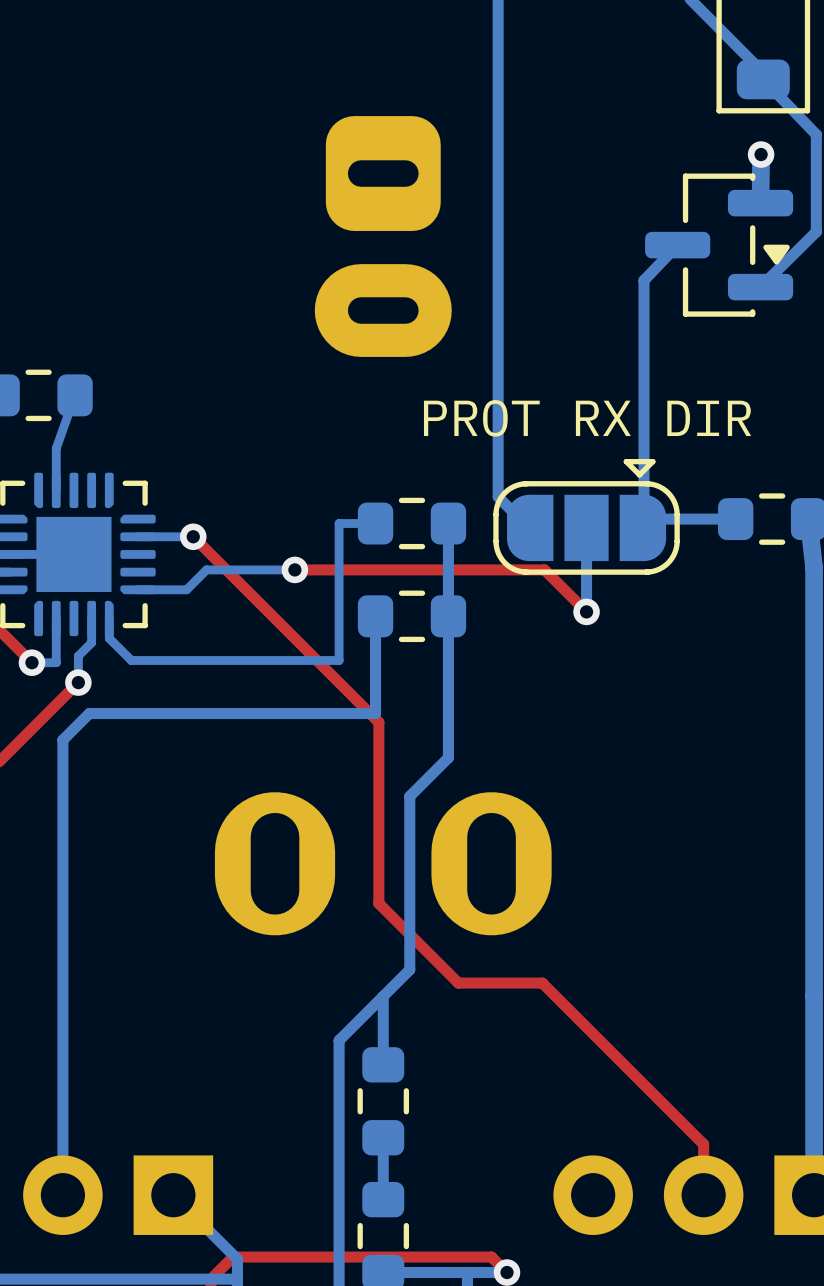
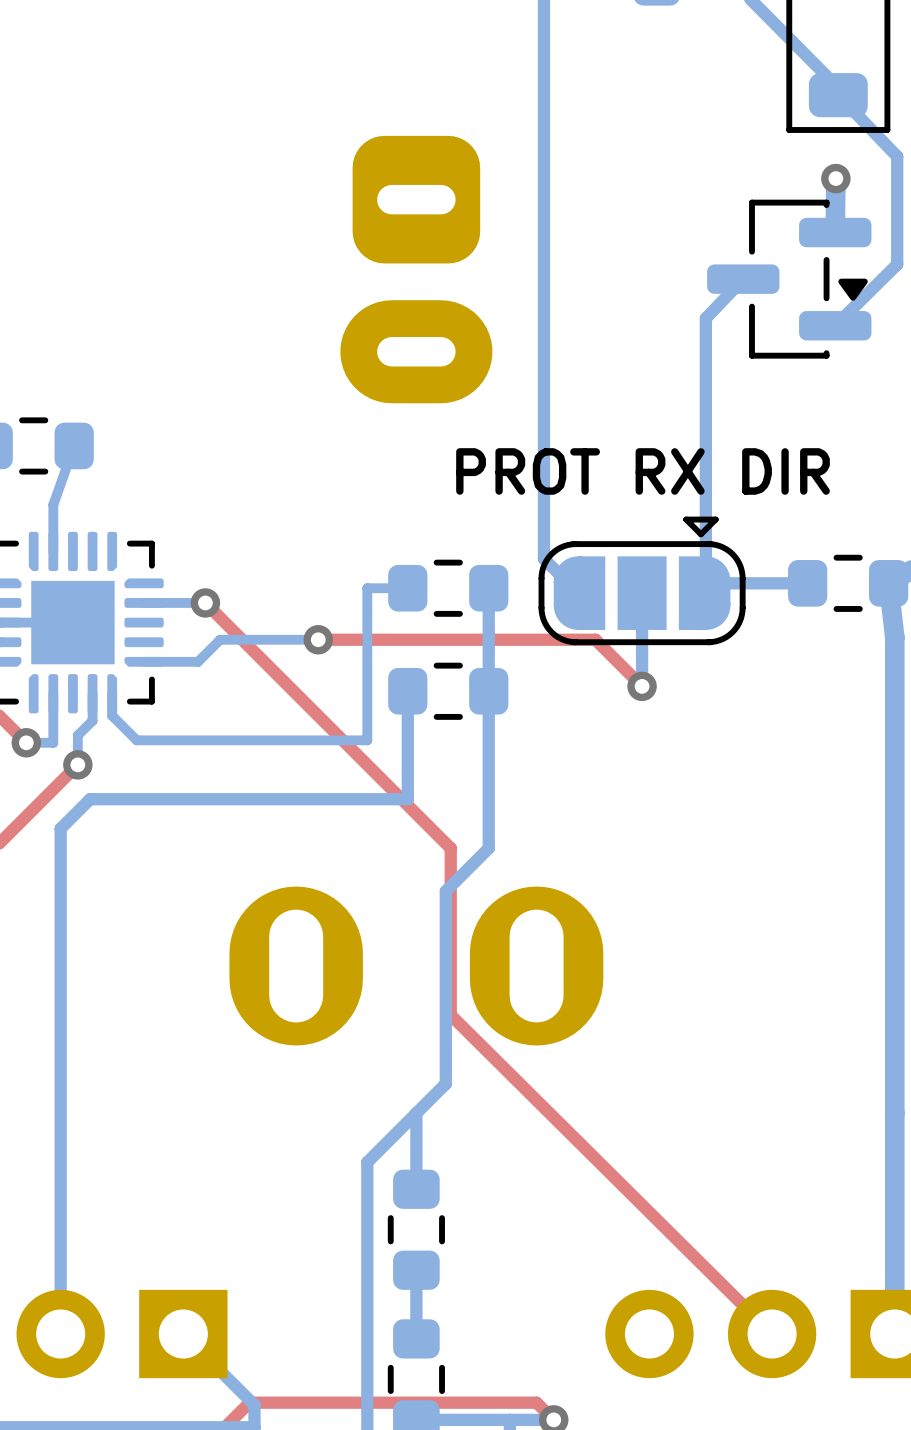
top track: (378, 722) (378, 903) (458, 983) (542, 983) (703, 1144) (703, 1195) -> (411, 809) (450, 848) (450, 1015) (772, 1334)

